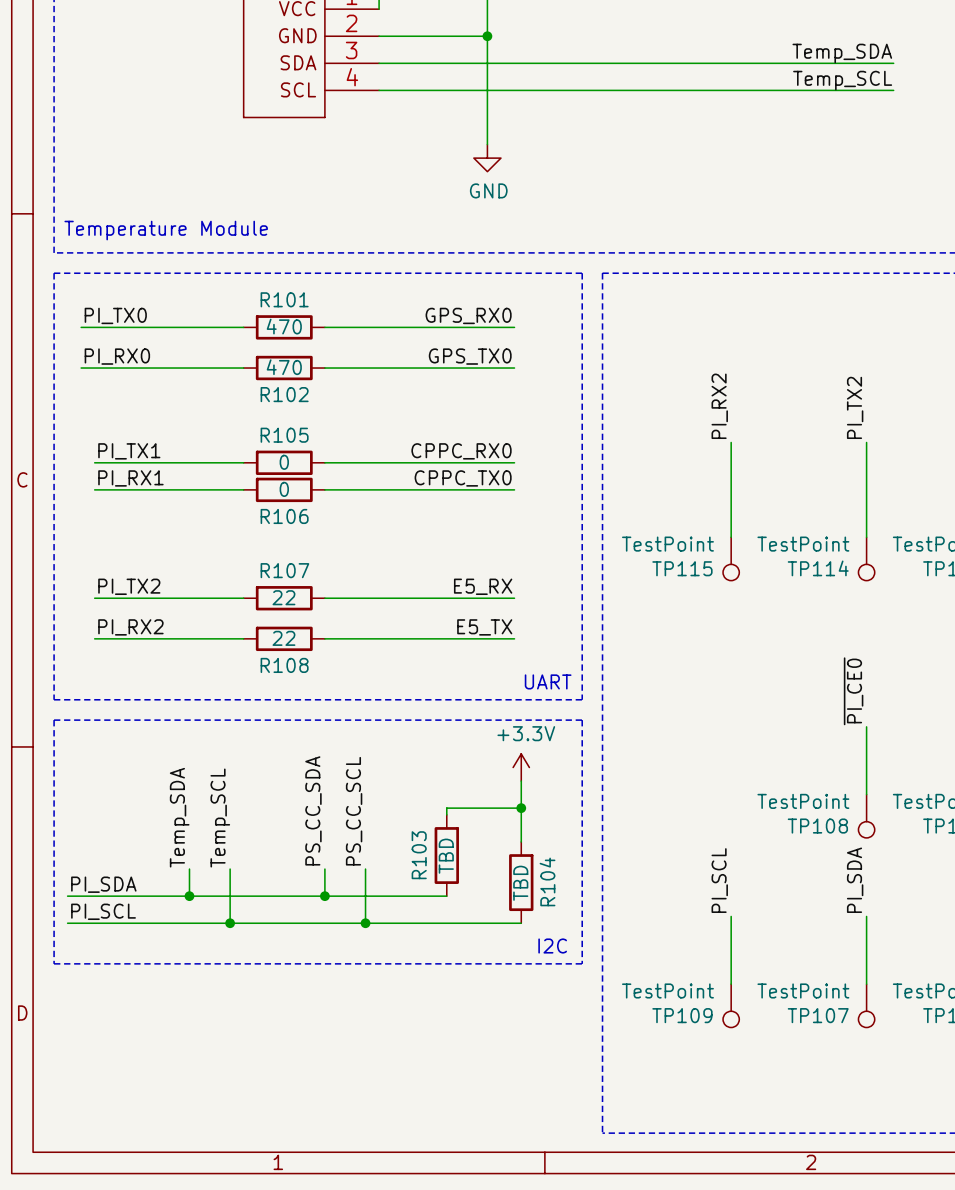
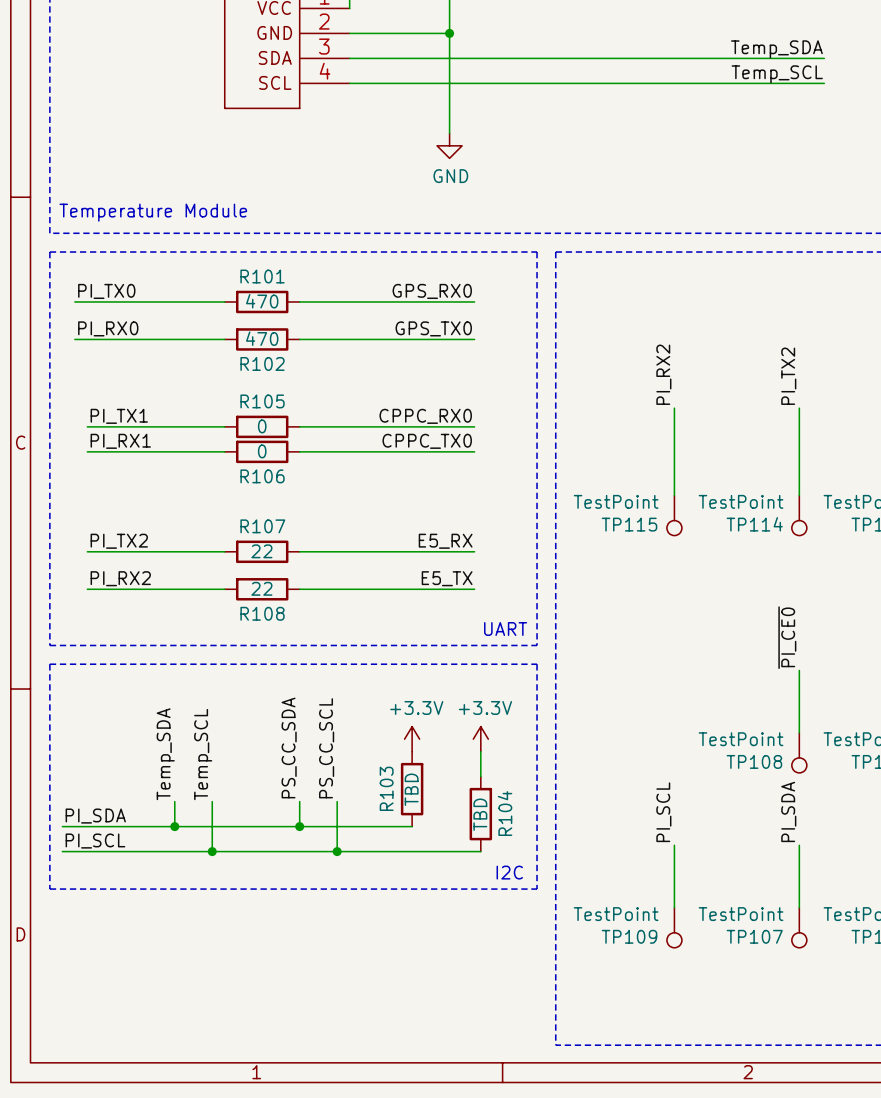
power symbol position: +3.3V (521, 767) -> +3.3V (480, 739)
power symbol: none -> +3.3V (412, 739)
wire: (521, 808) (446, 808) (446, 814) -> none
junction: (521, 808) -> none

